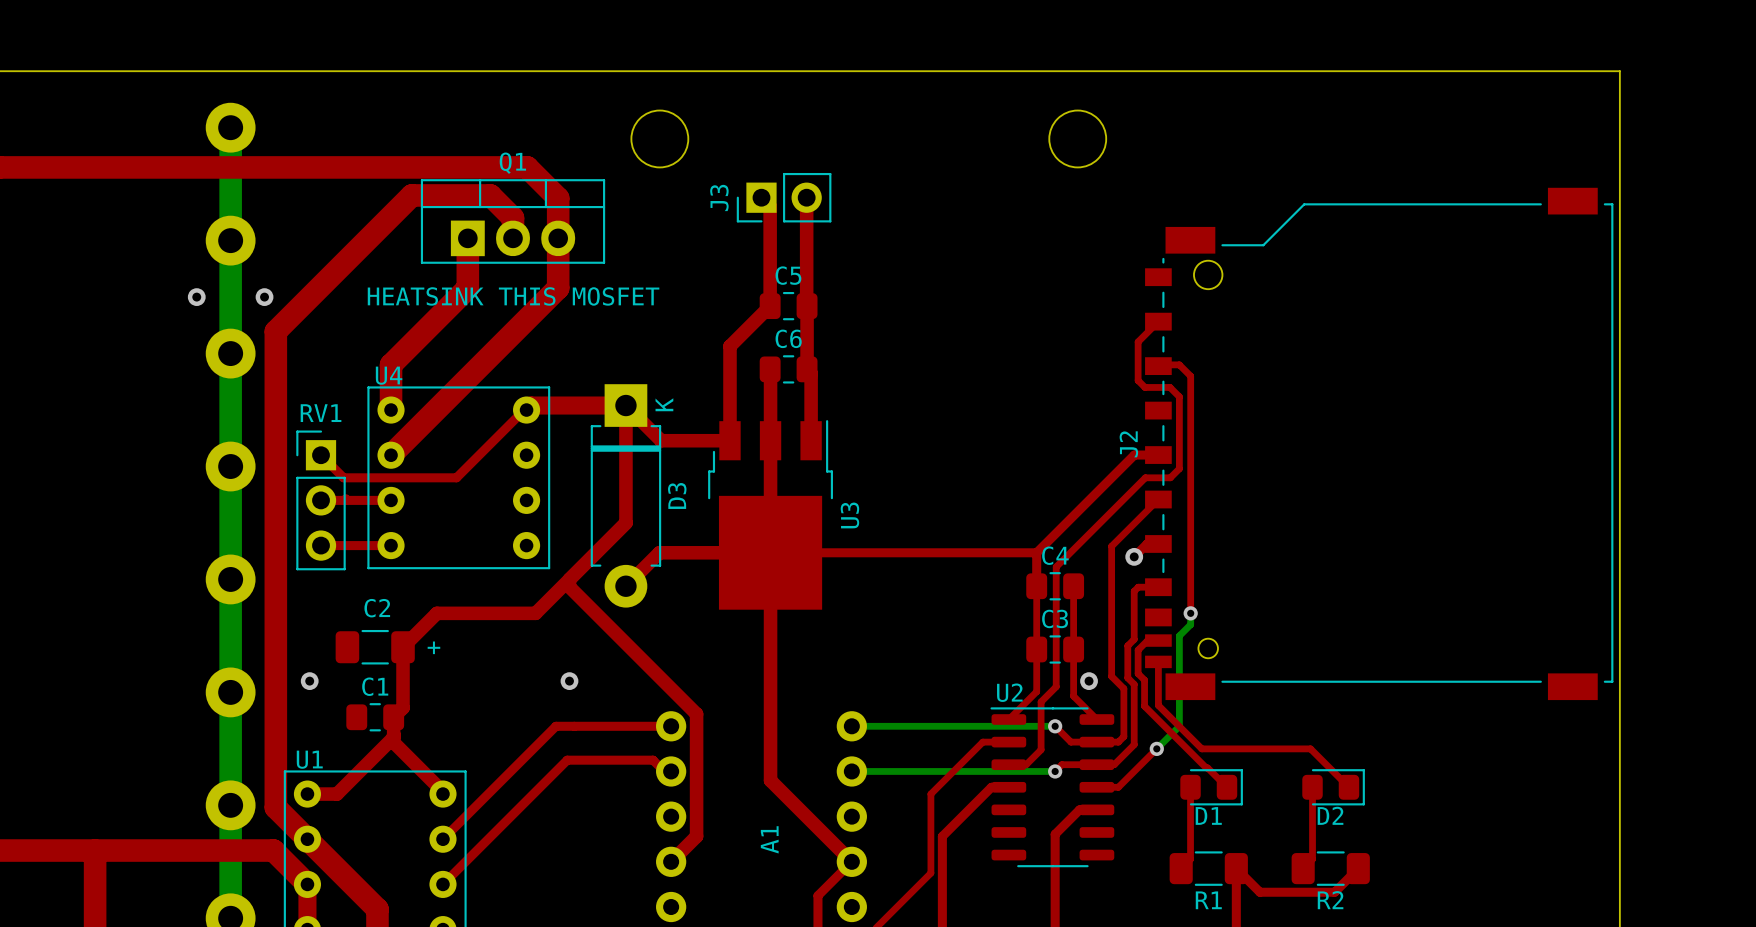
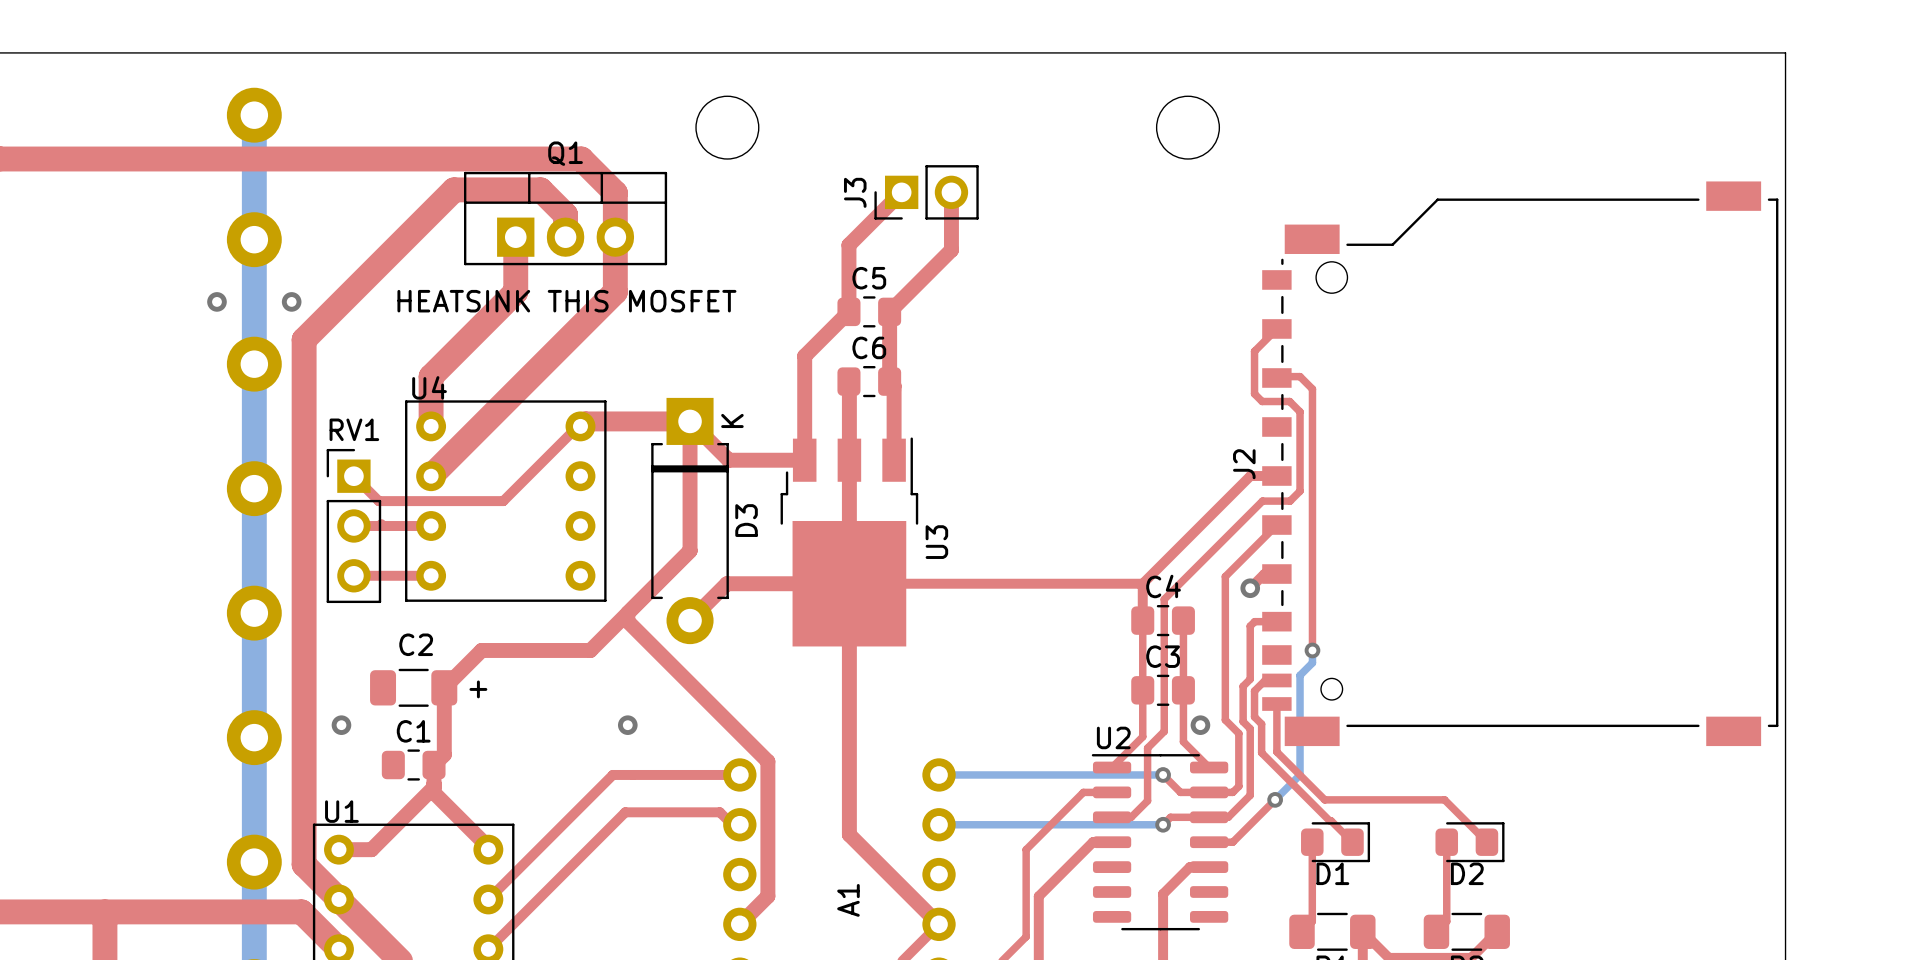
top track: (761, 197) (770, 206) (770, 245) -> (901, 192) (848, 245)
J3 position: (784, 197) -> (926, 192)
top track: (806, 197) (807, 306) -> (951, 192) (951, 250) (889, 311)

